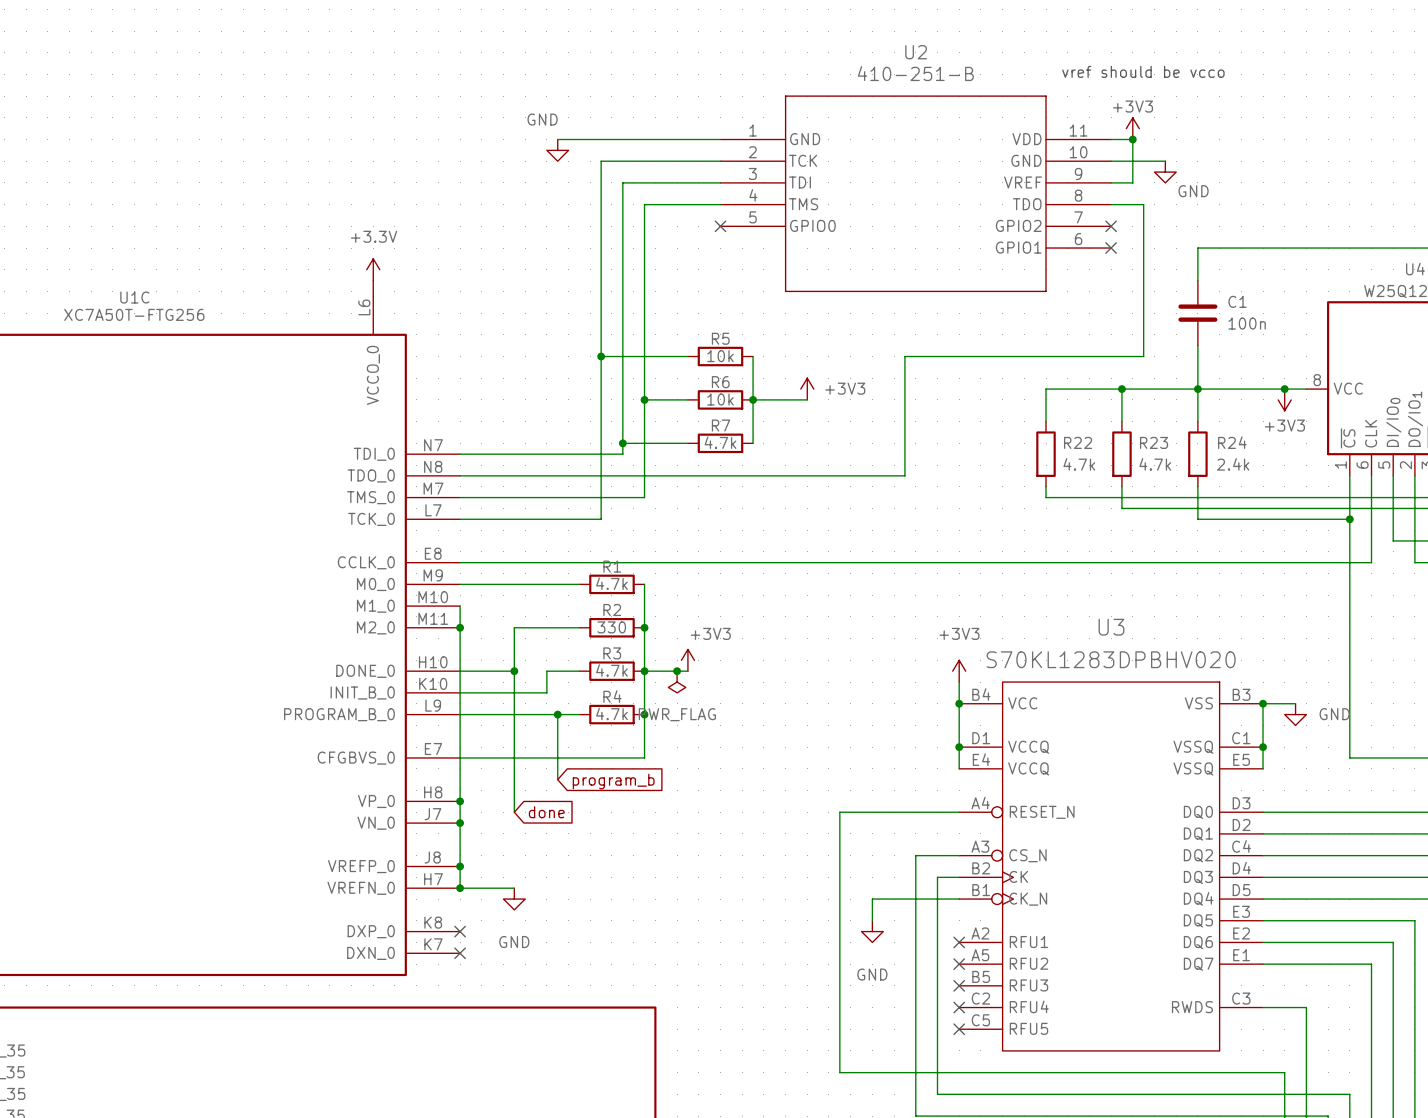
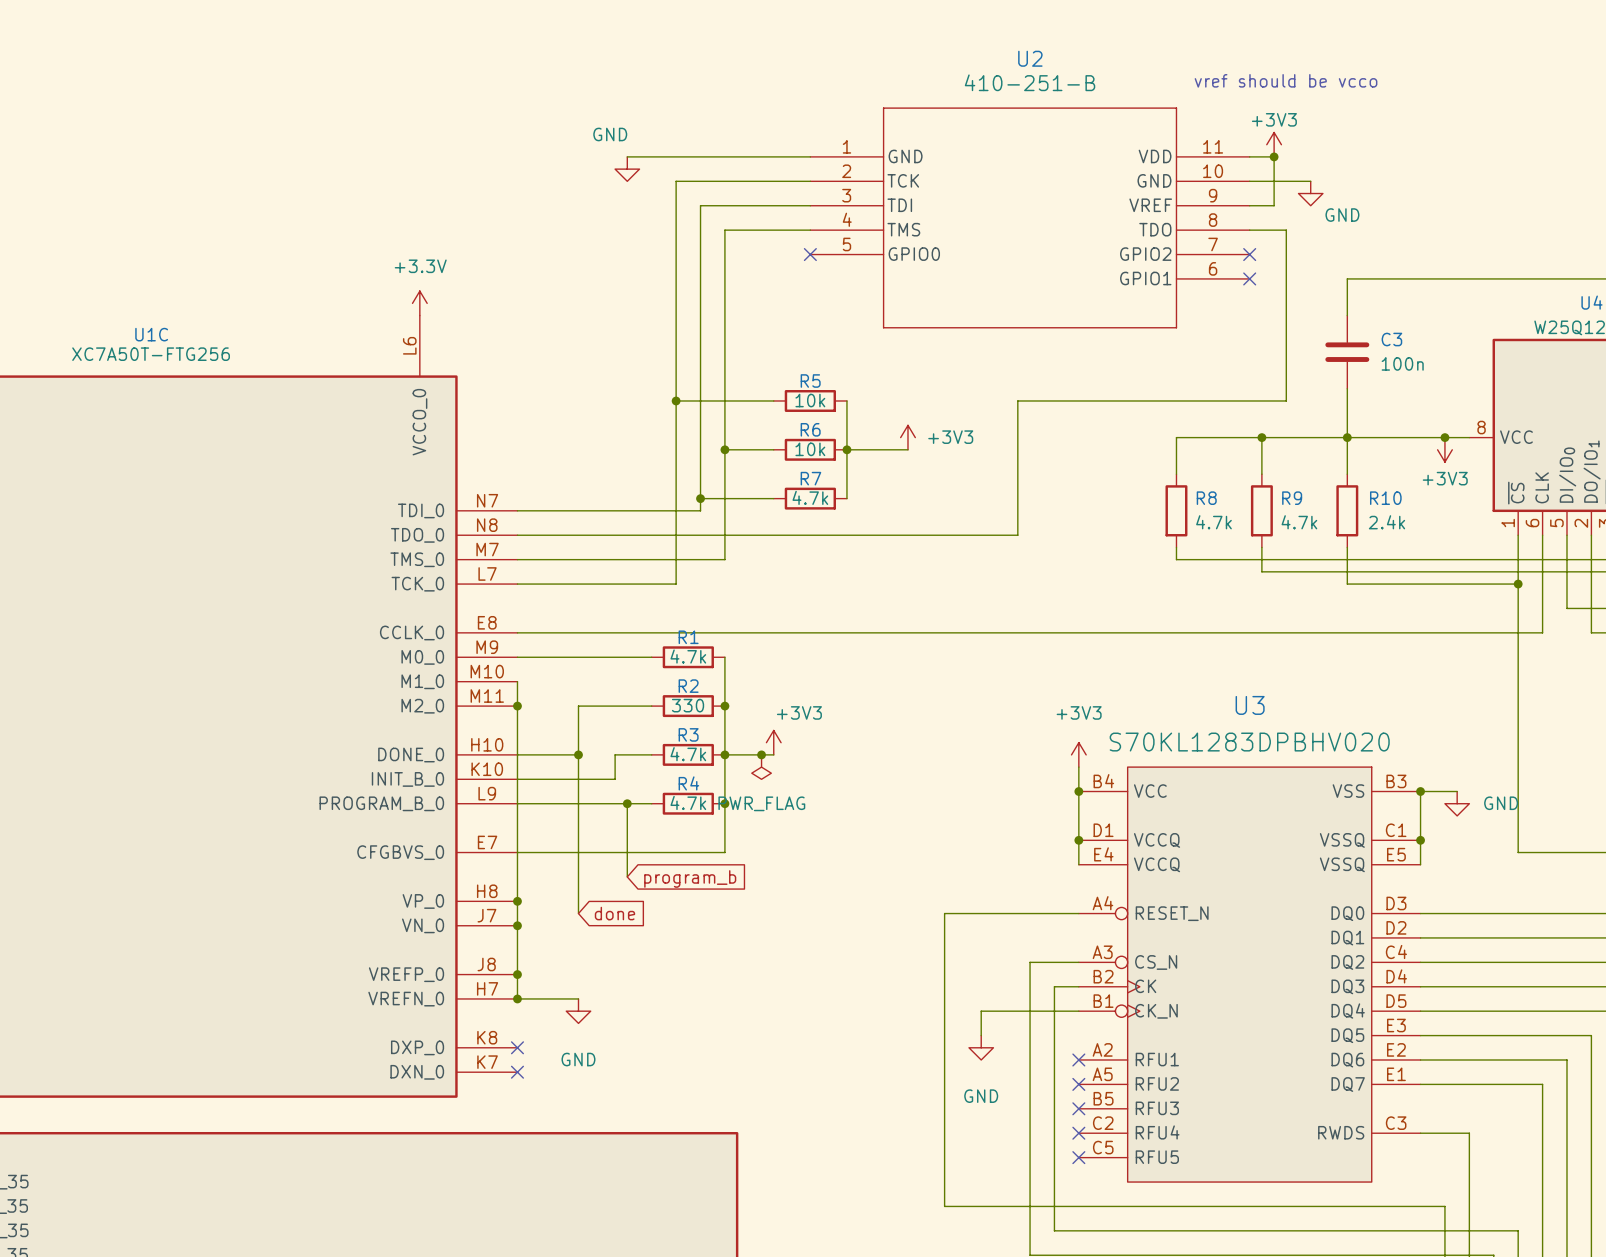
C1 name: C1 (1237, 301) -> C3 (1391, 339)
R22 name: R22 (1078, 442) -> R8 (1206, 498)
R23 name: R23 (1154, 442) -> R9 (1292, 498)
R24 name: R24 (1232, 442) -> R10 (1385, 498)

